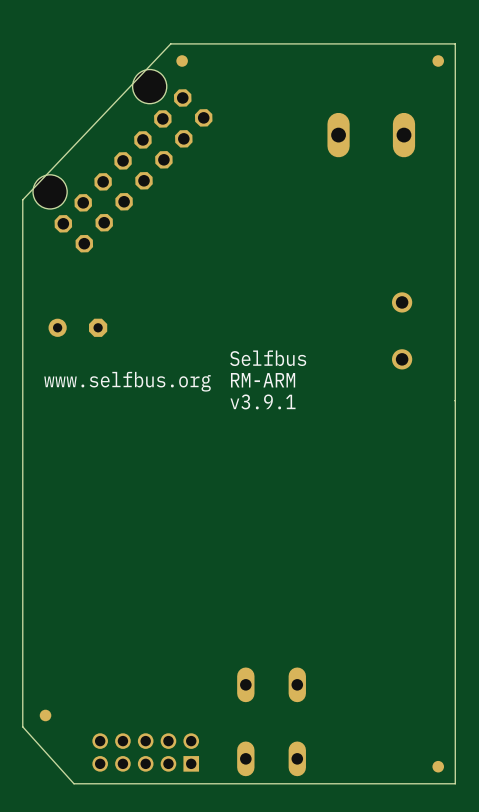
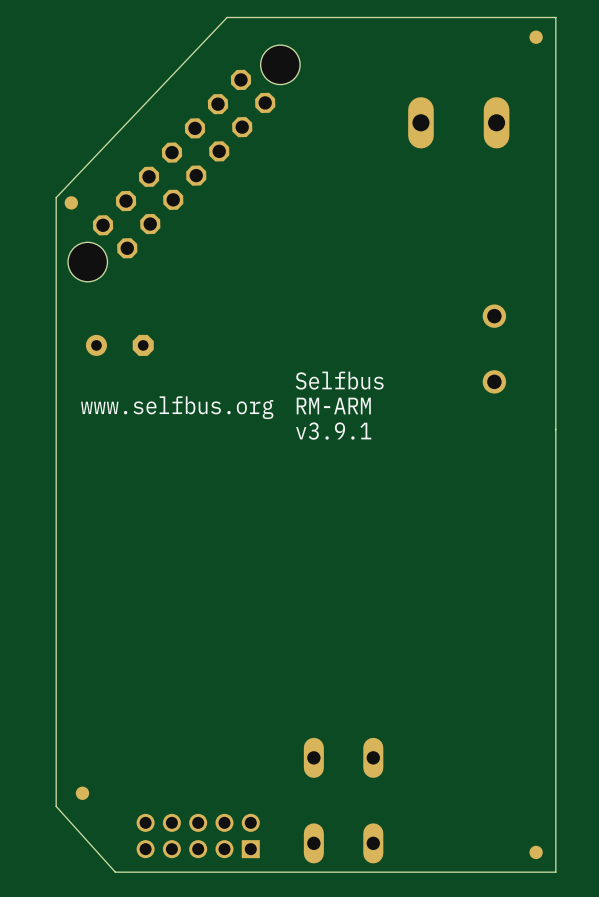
part position: (182, 60) -> (71, 202)
hole position: (149, 86) -> (280, 64)
hole position: (50, 191) -> (87, 262)

